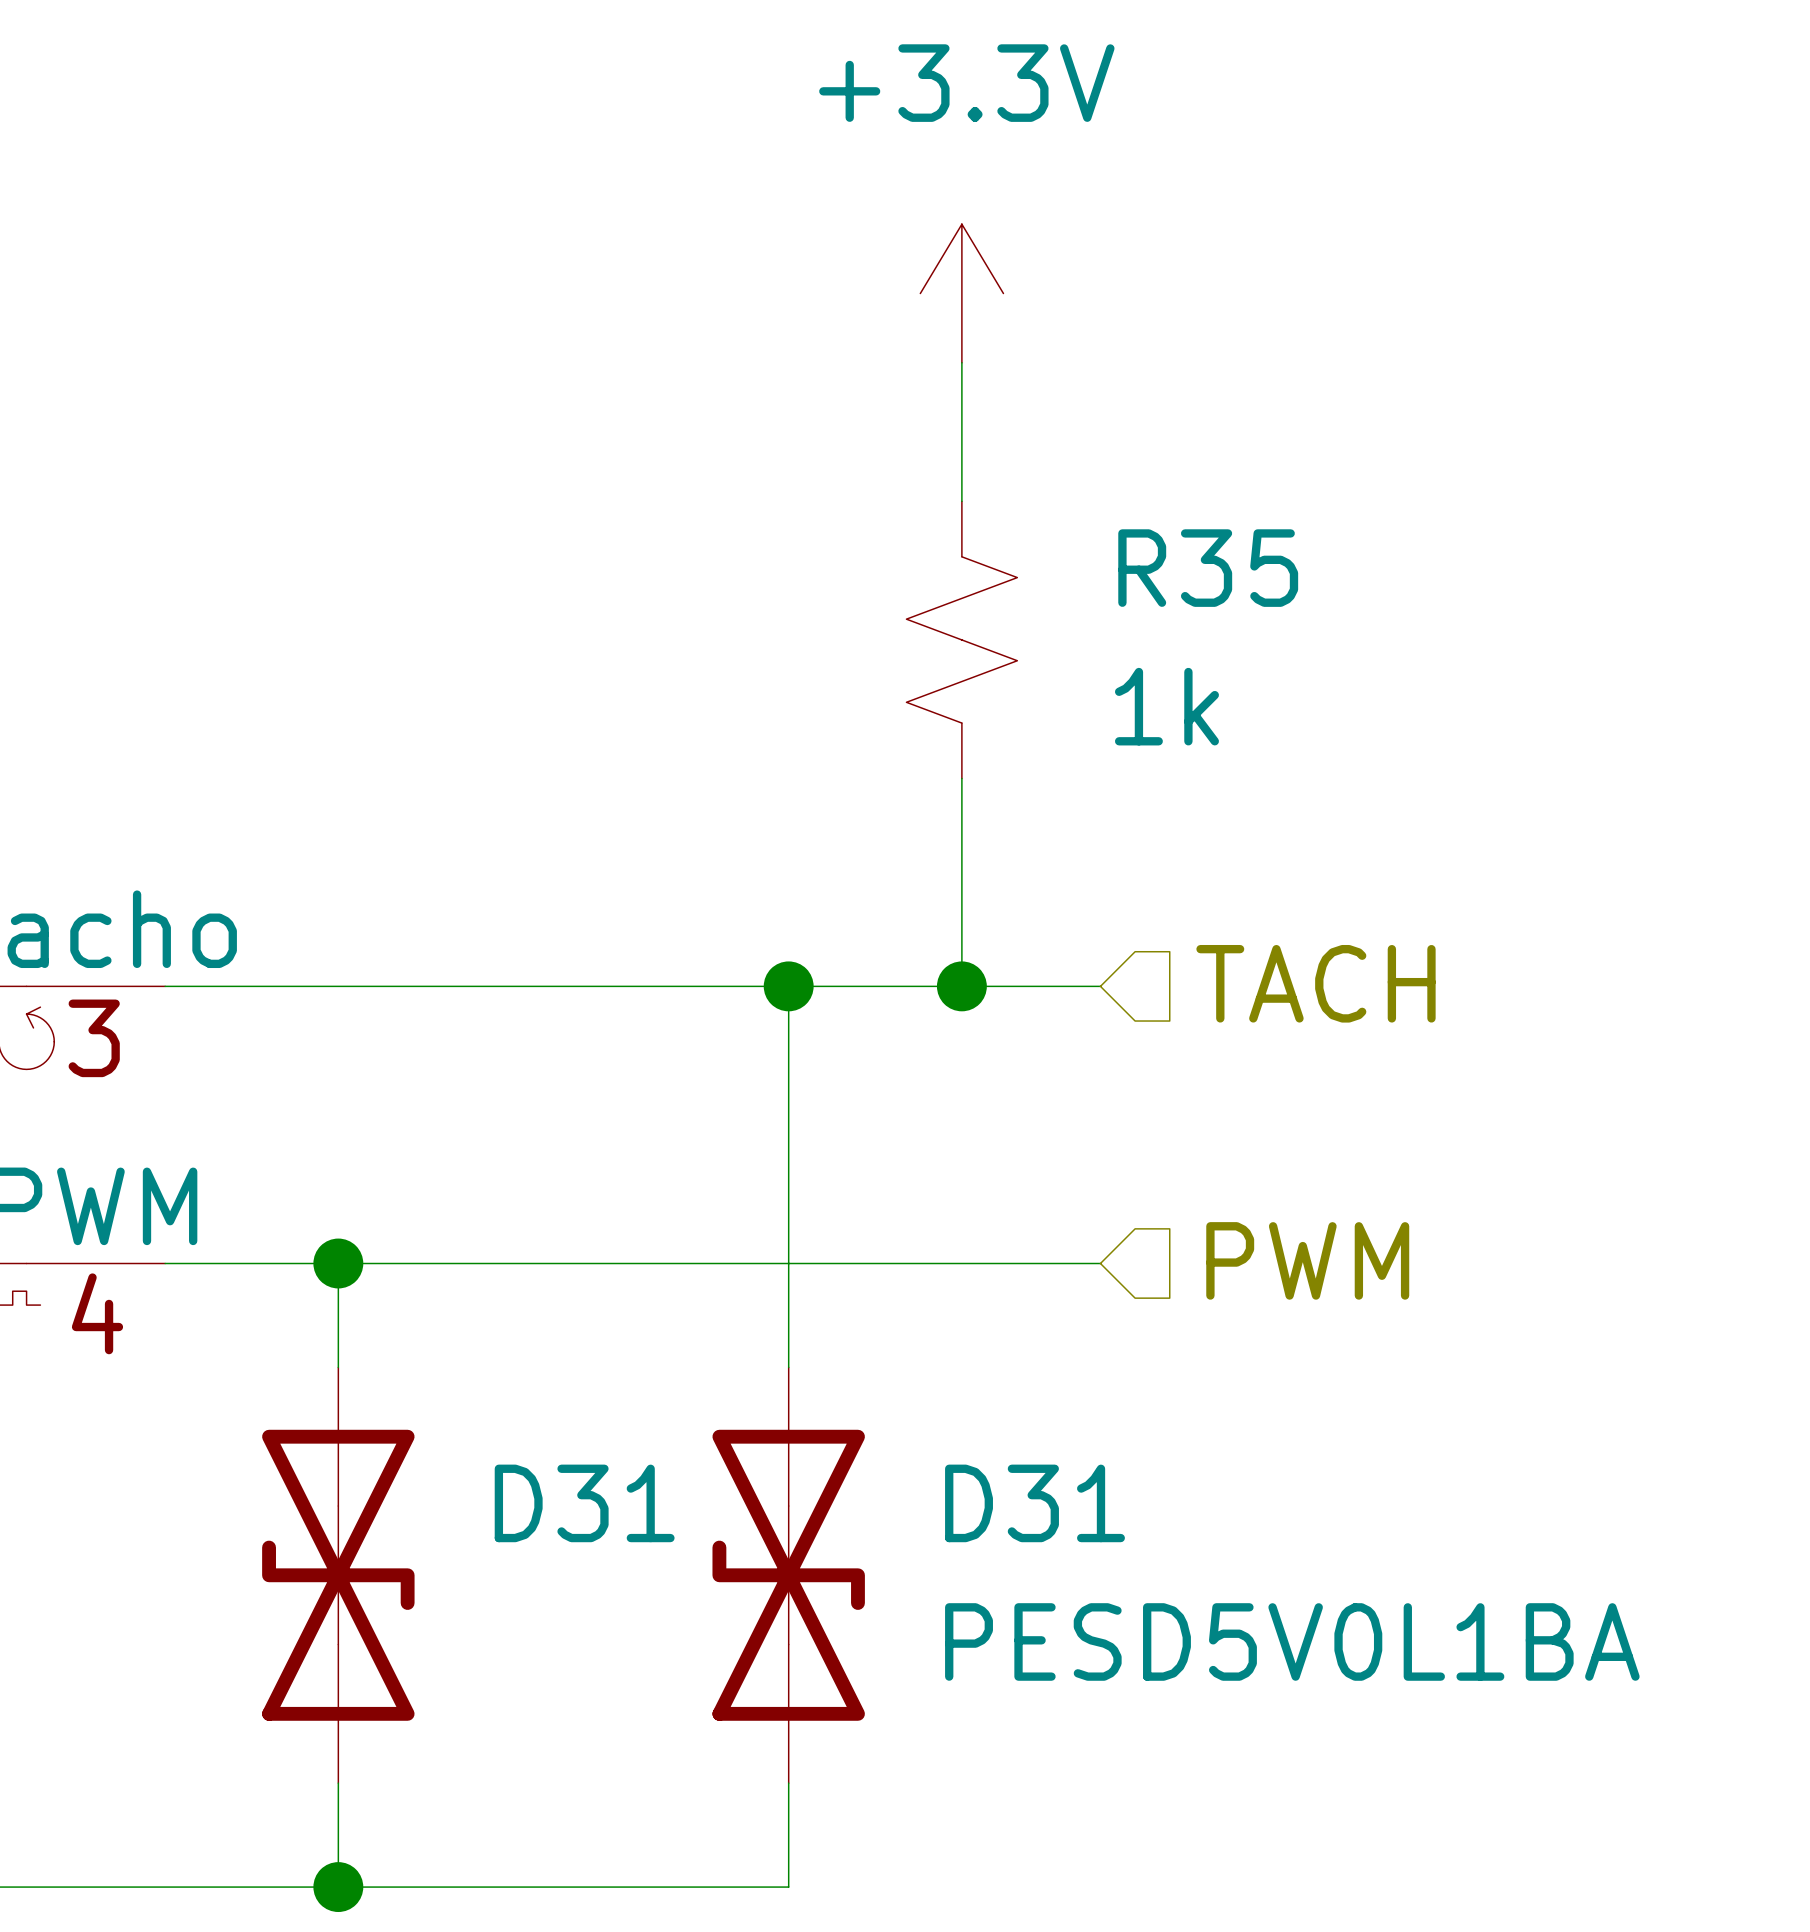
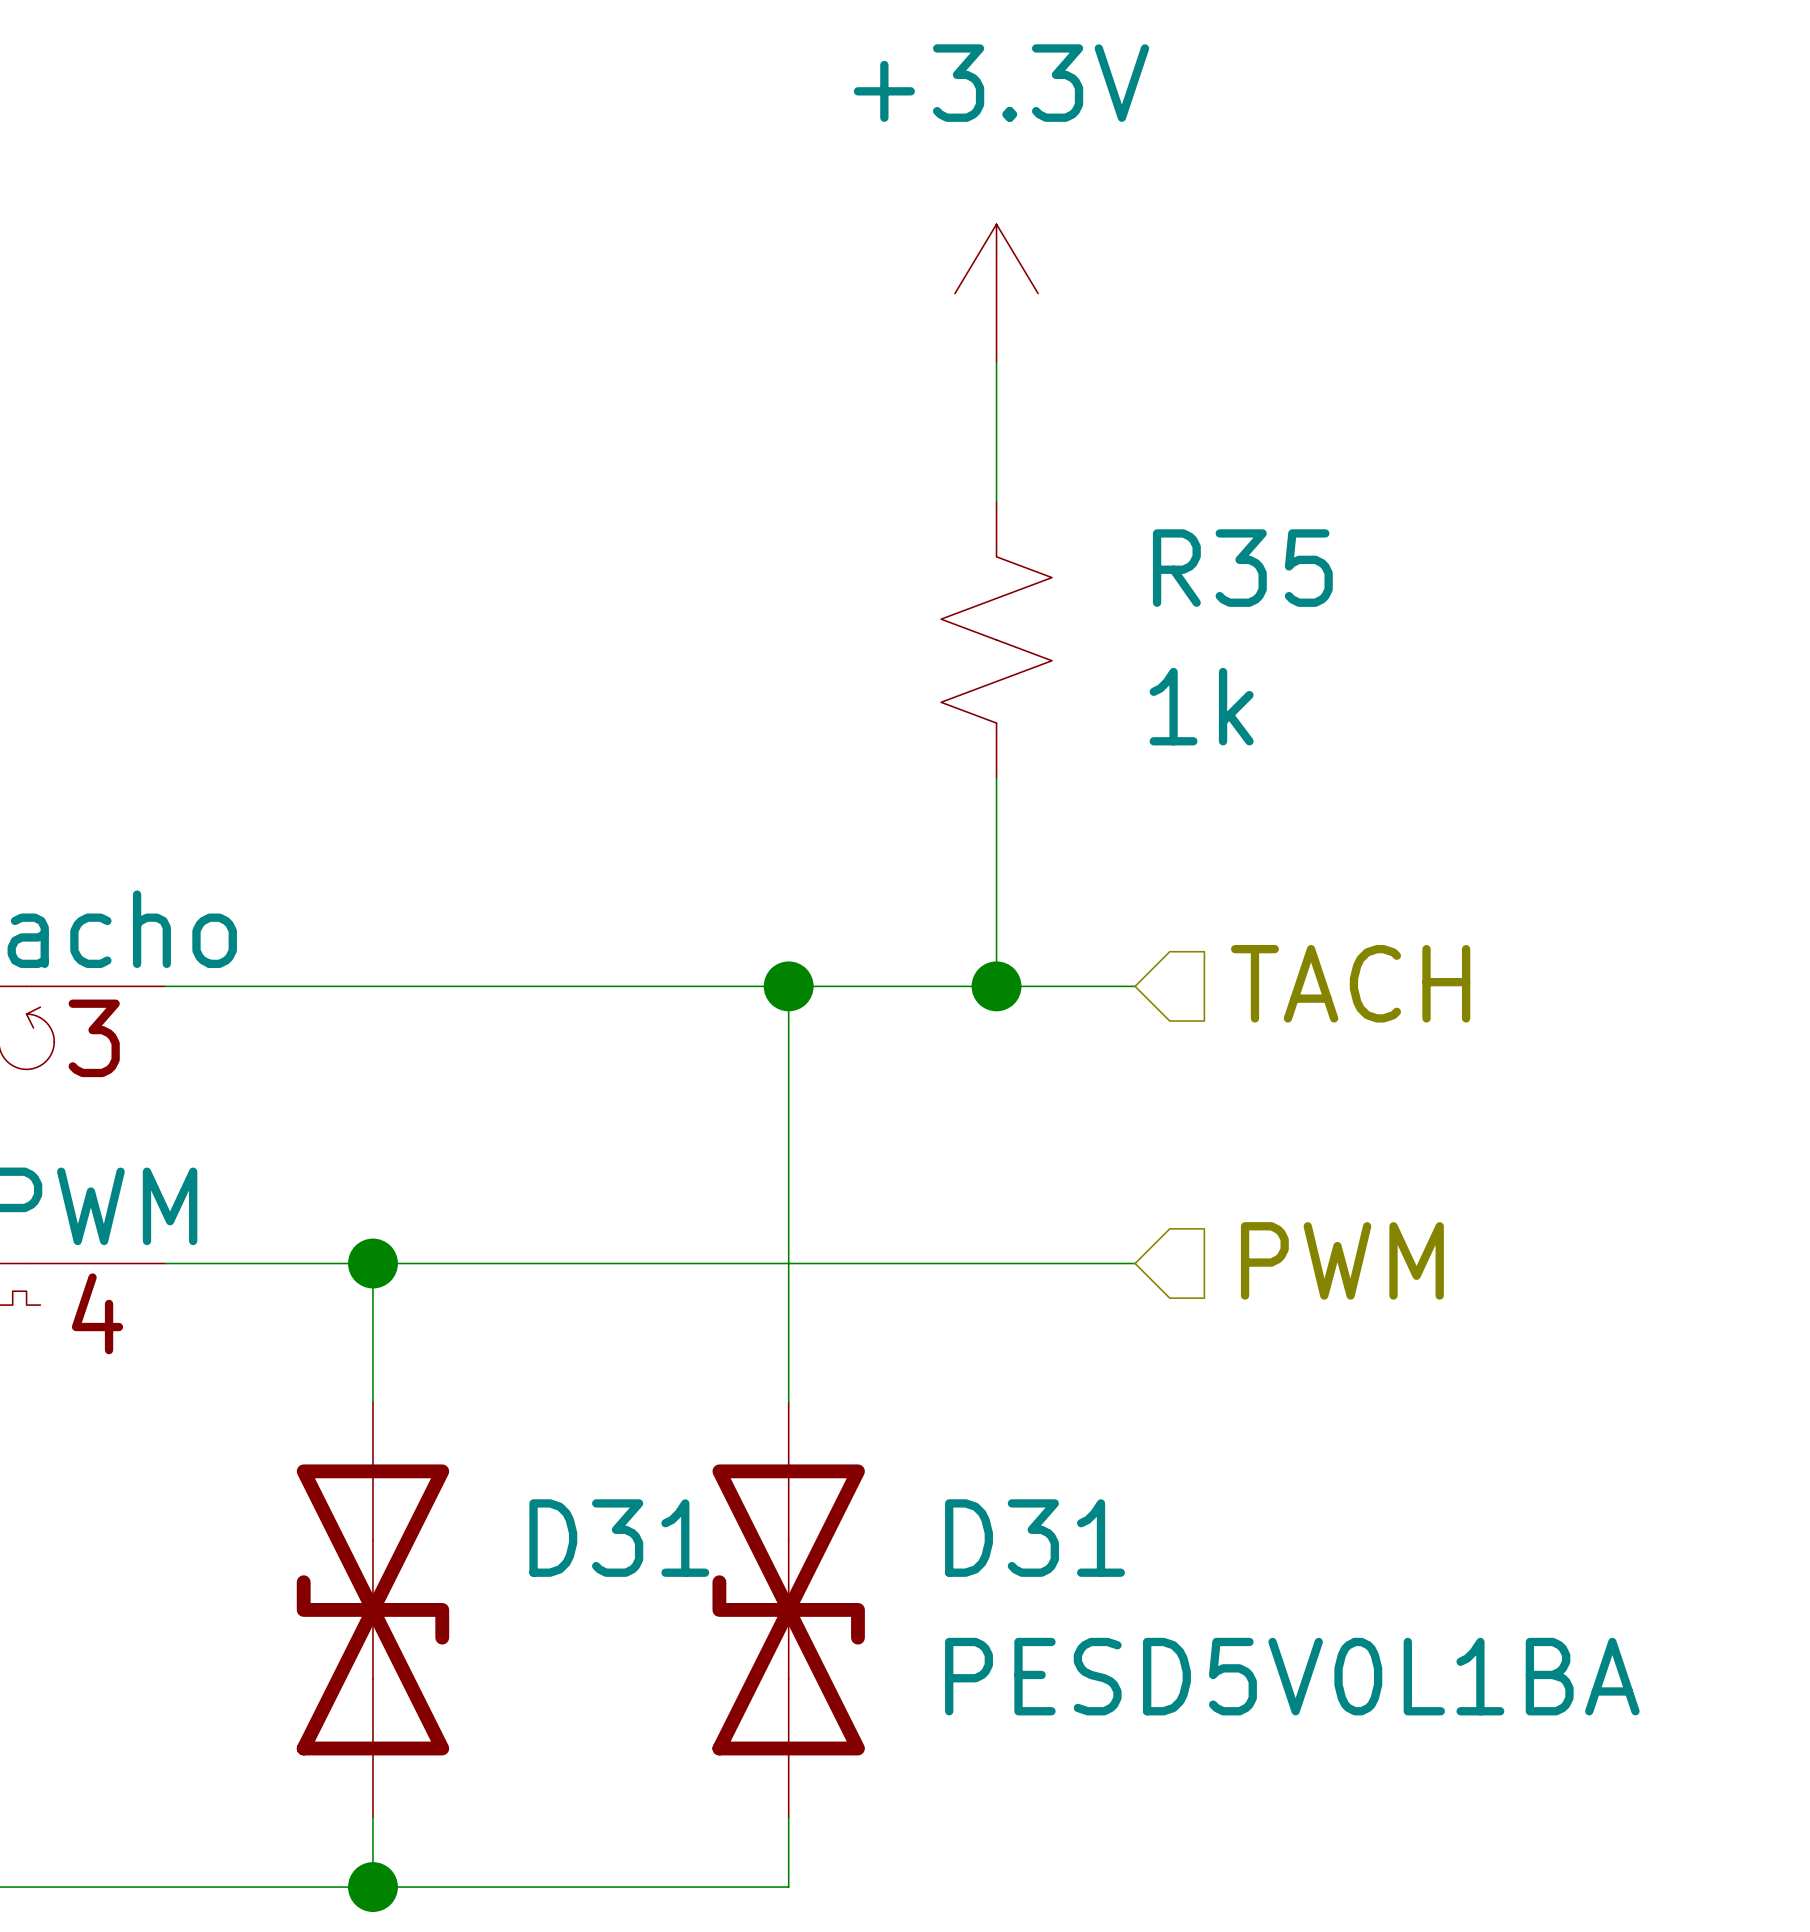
power symbol position: +3.3V (961, 293) -> +3.3V (996, 293)
wire: (961, 362) (961, 501) -> (996, 362) (996, 501)
R35 position: (961, 639) -> (996, 639)
wire: (961, 778) (961, 986) -> (996, 778) (996, 986)
hierarchical label position: TACH (1315, 983) -> TACH (1350, 983)
junction position: (961, 986) -> (996, 986)
wire: none -> (1100, 986) (1135, 986)
hierarchical label position: PWM (1307, 1260) -> PWM (1342, 1260)
wire: (338, 1263) (338, 1367) -> none
junction position: (338, 1263) -> (372, 1263)
wire: none -> (372, 1263) (372, 1402)
wire: none -> (1100, 1263) (1135, 1263)
D31 position: (338, 1575) -> (372, 1609)
D31 position: (788, 1575) -> (788, 1609)
wire: (338, 1783) (338, 1887) -> none
wire: none -> (372, 1817) (372, 1887)
junction position: (338, 1887) -> (372, 1887)

